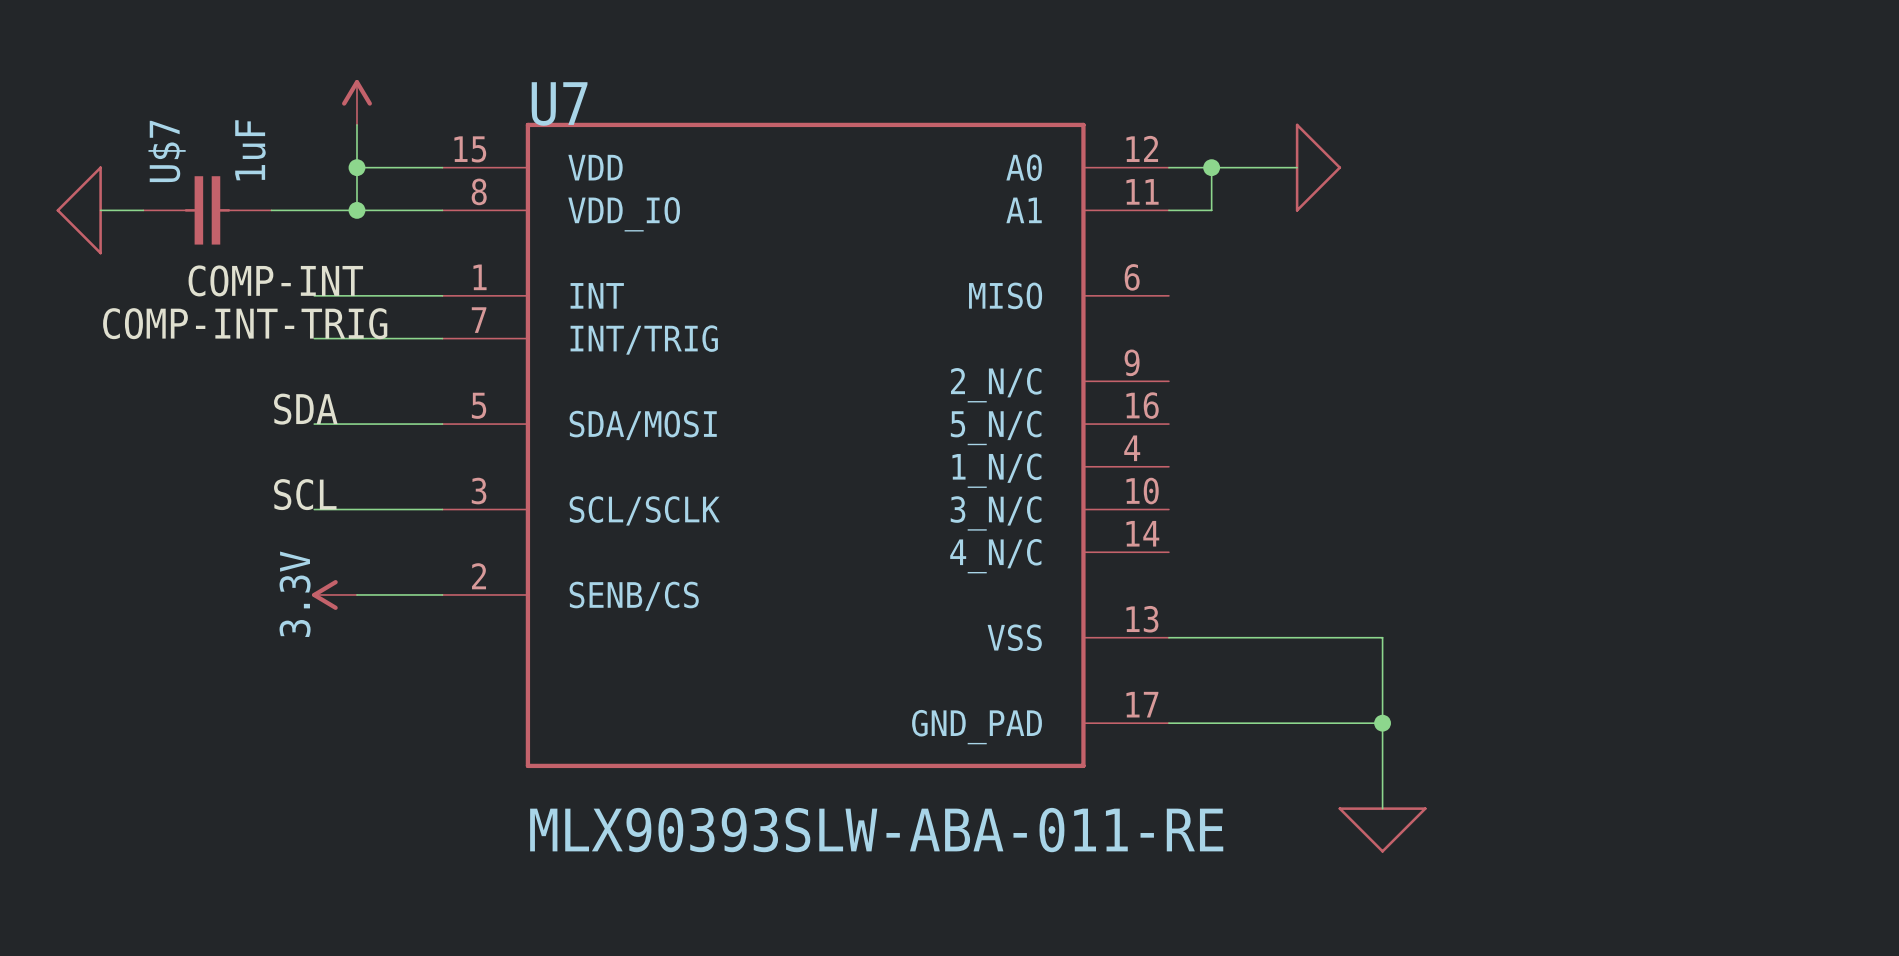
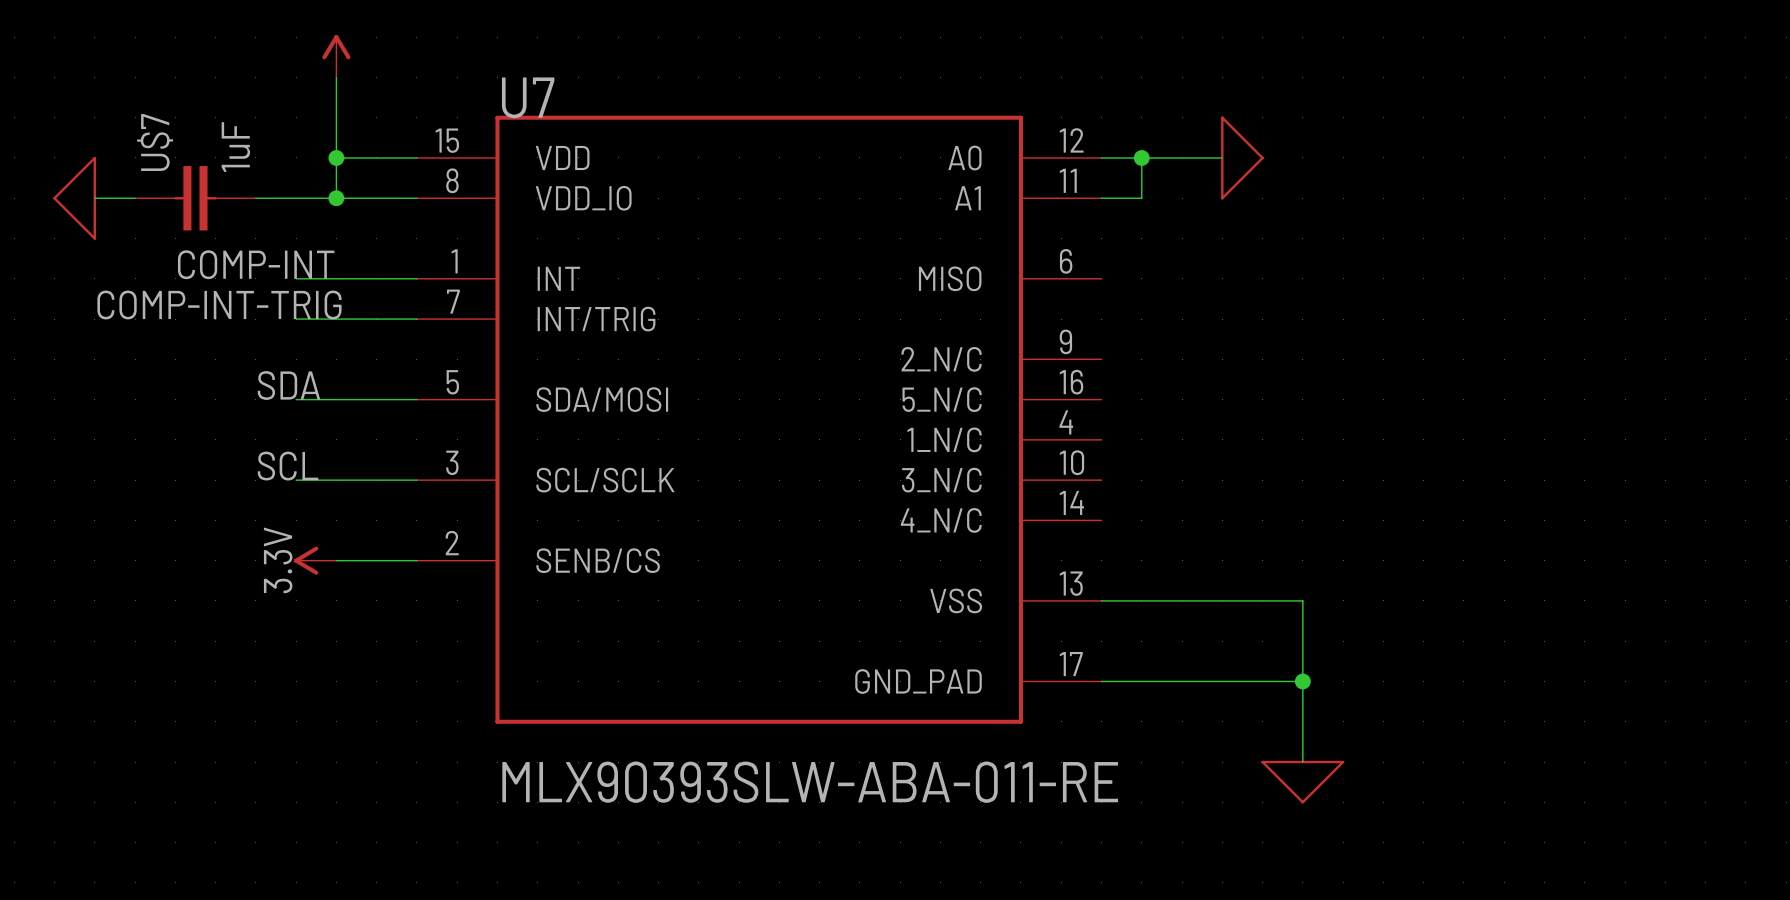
power symbol position: (356, 102) -> (336, 56)

